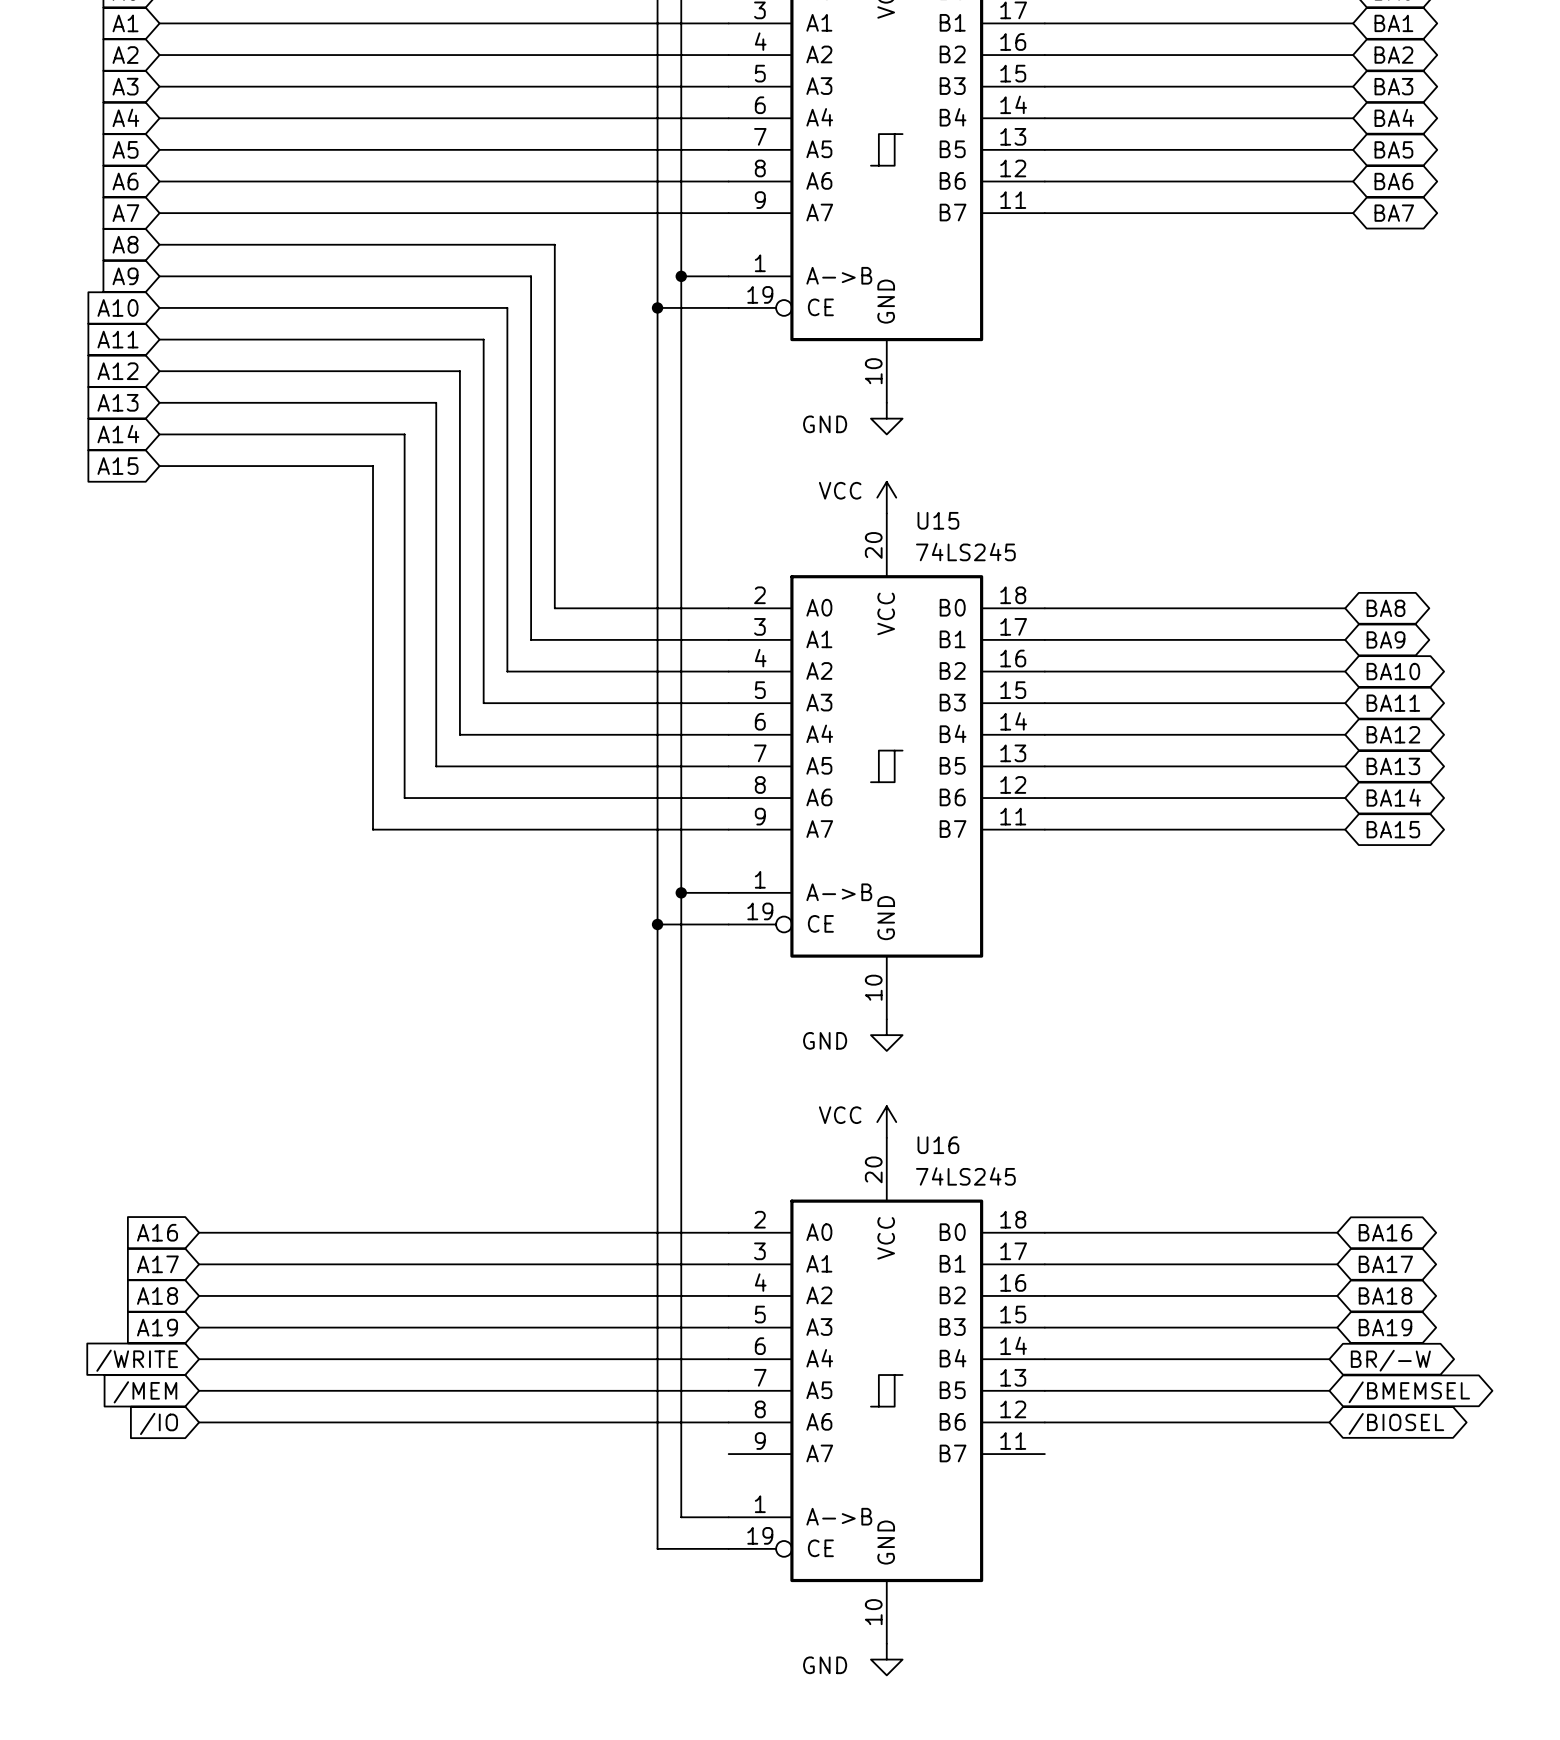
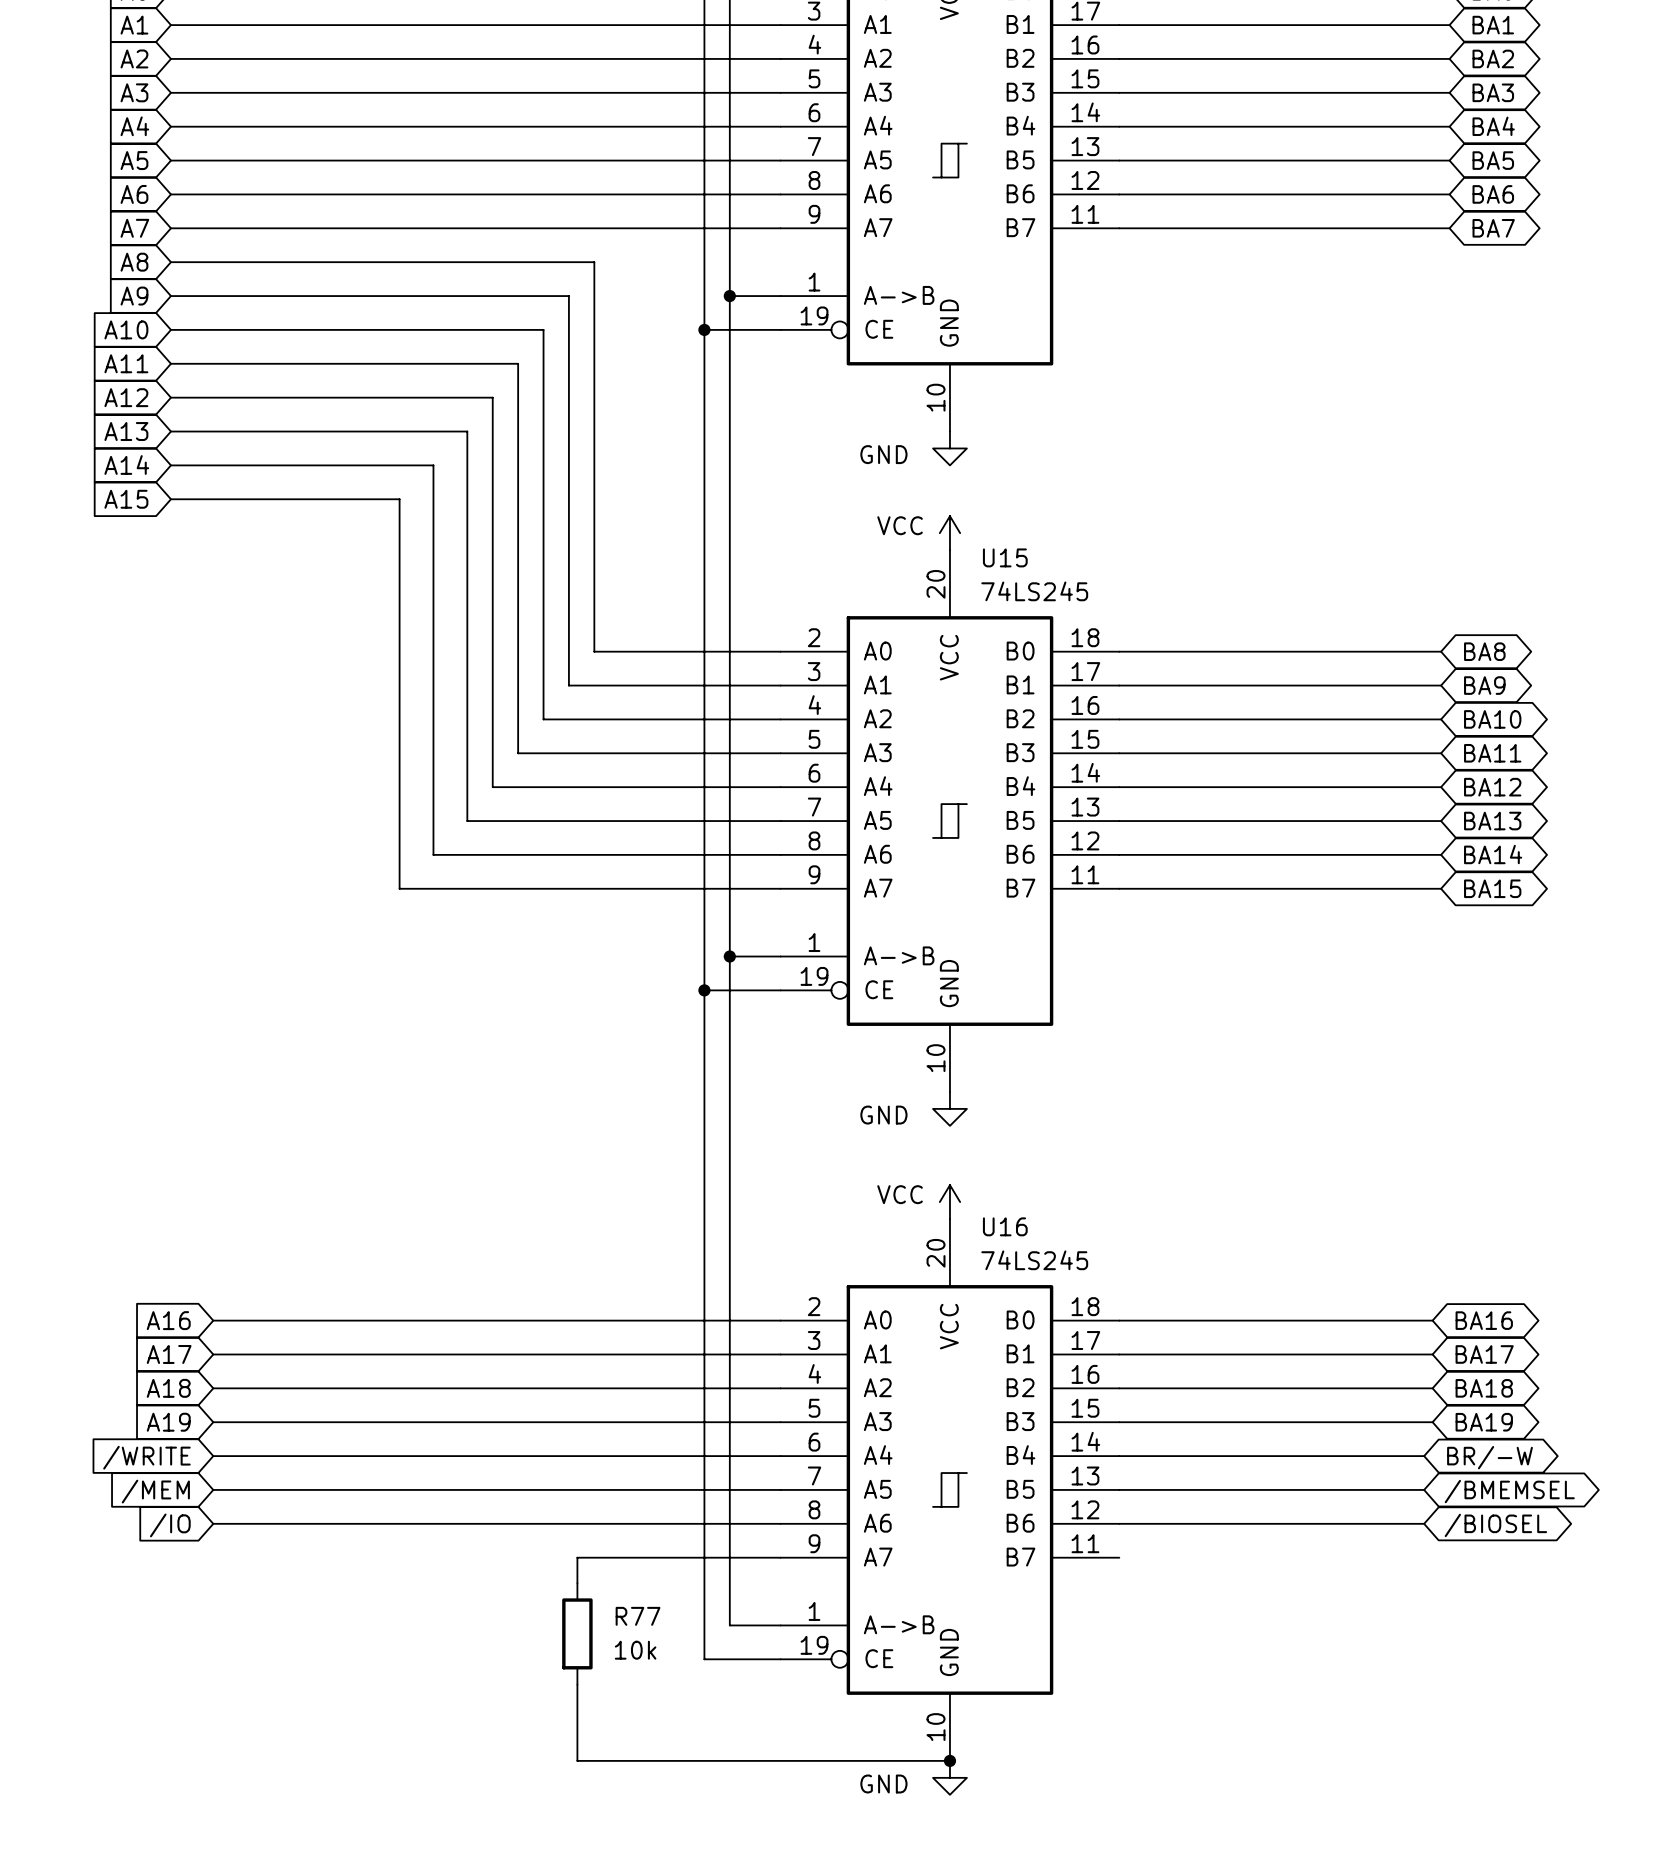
wire: none -> (780, 1557) (577, 1557) (577, 1583)
R77: none -> 10k (577, 1633)
wire: none -> (577, 1684) (577, 1760) (949, 1760)
junction: none -> (949, 1760)

